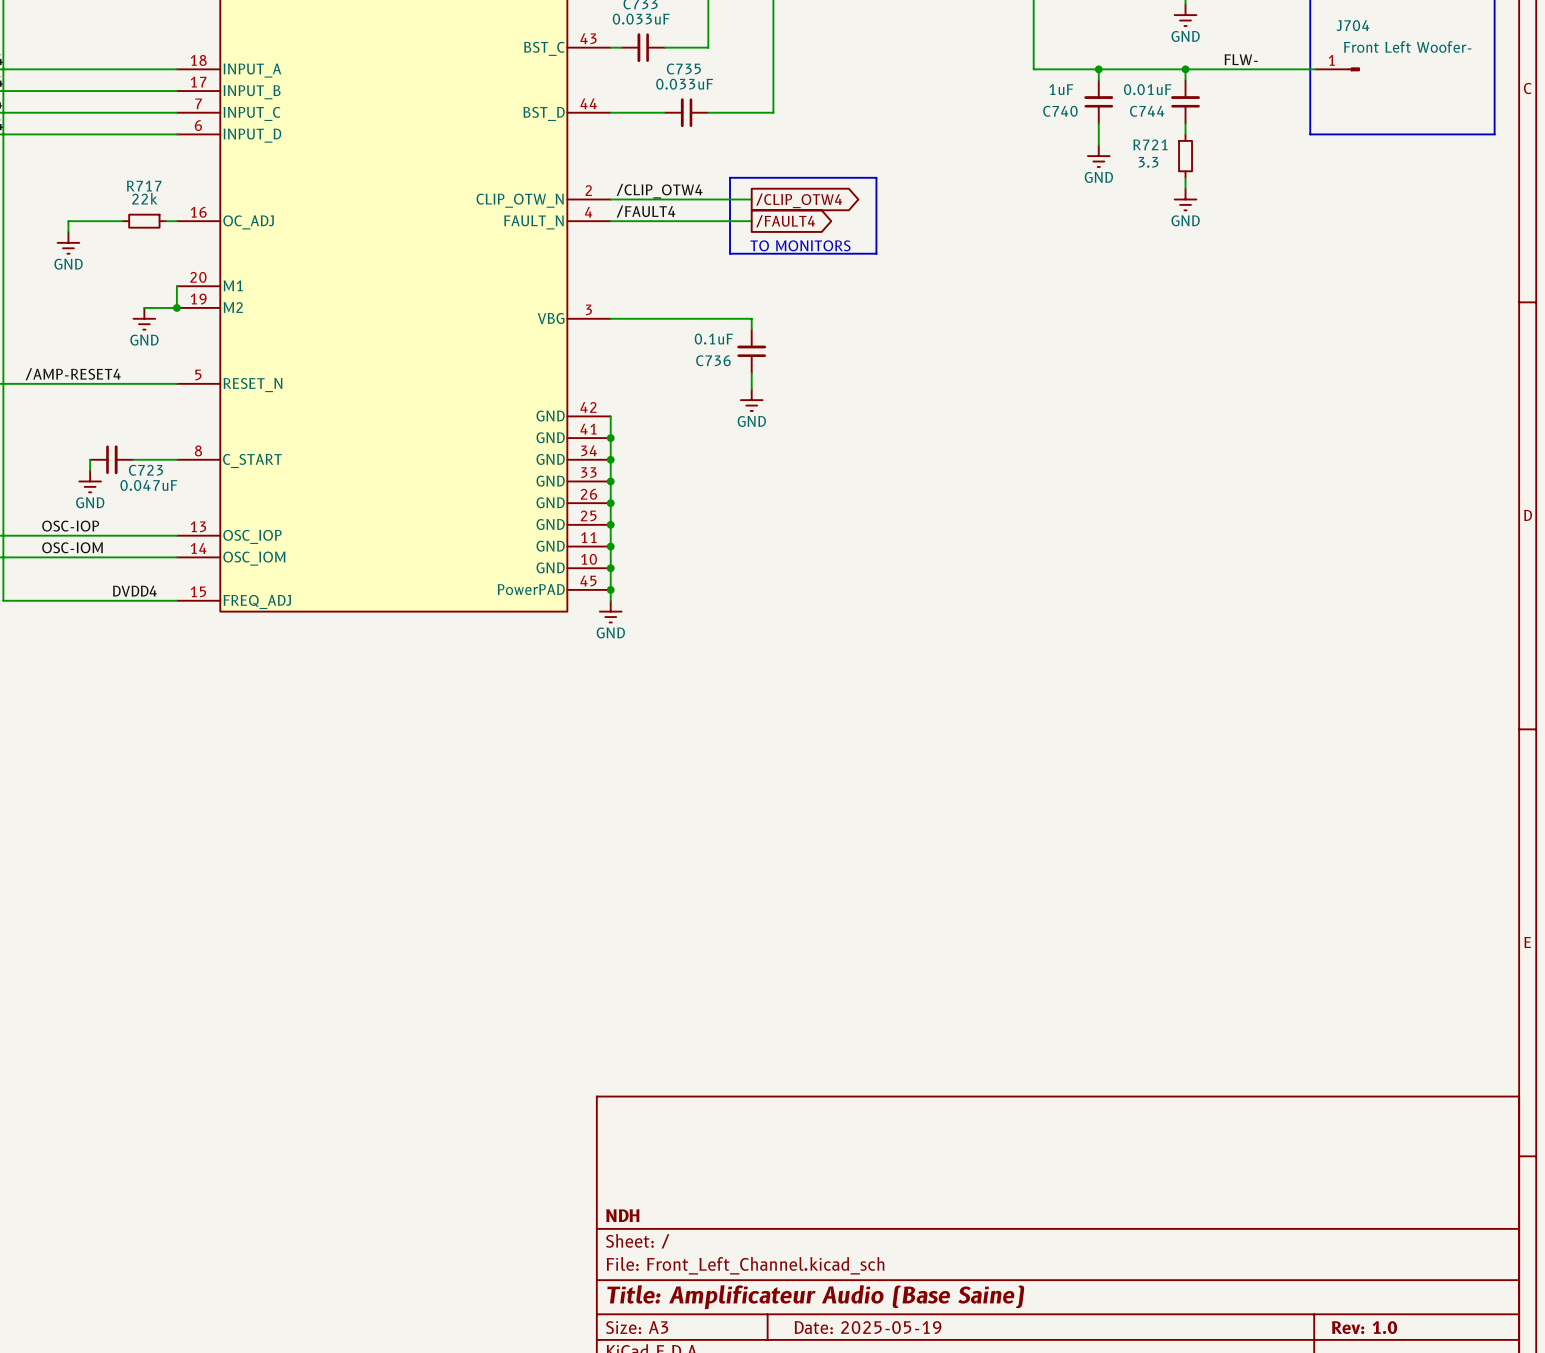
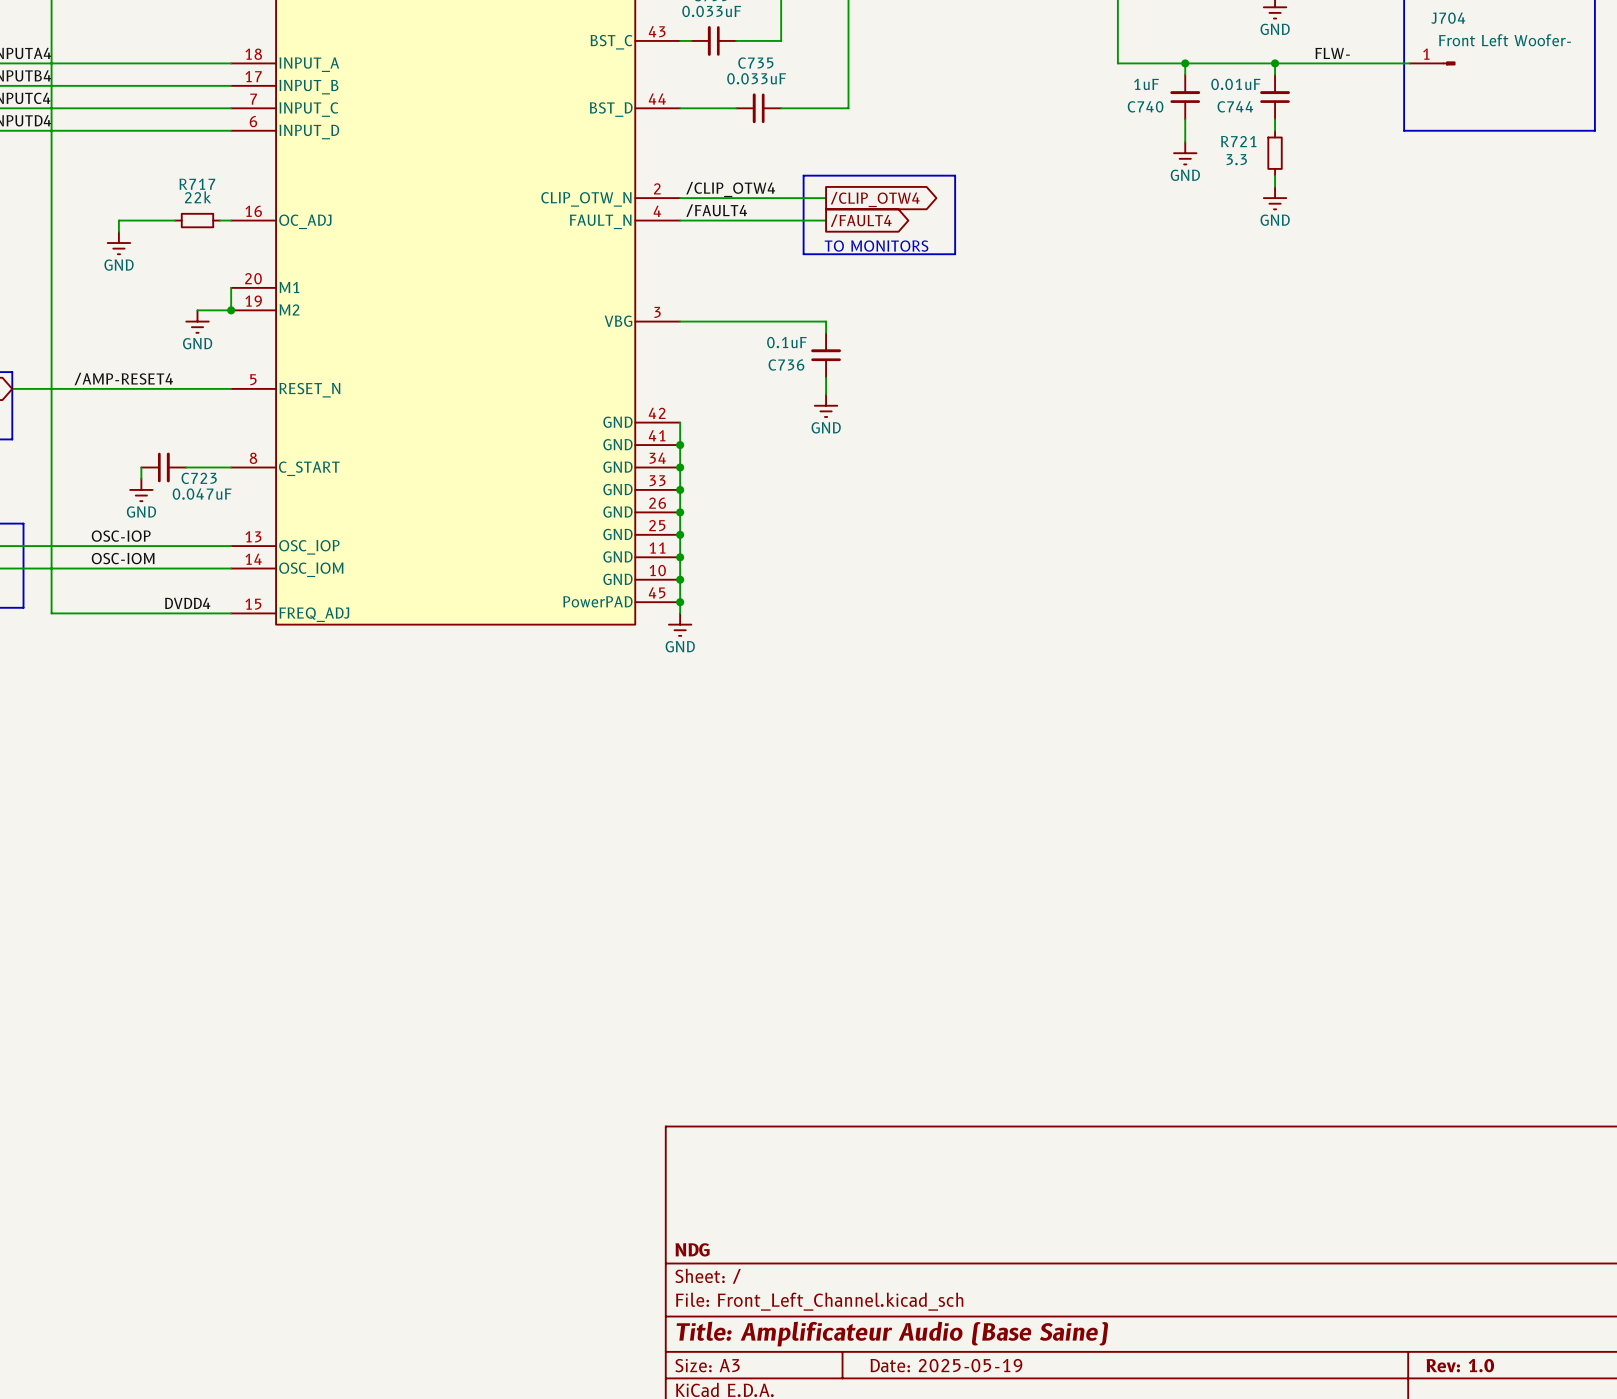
title block: NDH (622, 1215) -> NDG (692, 1249)

